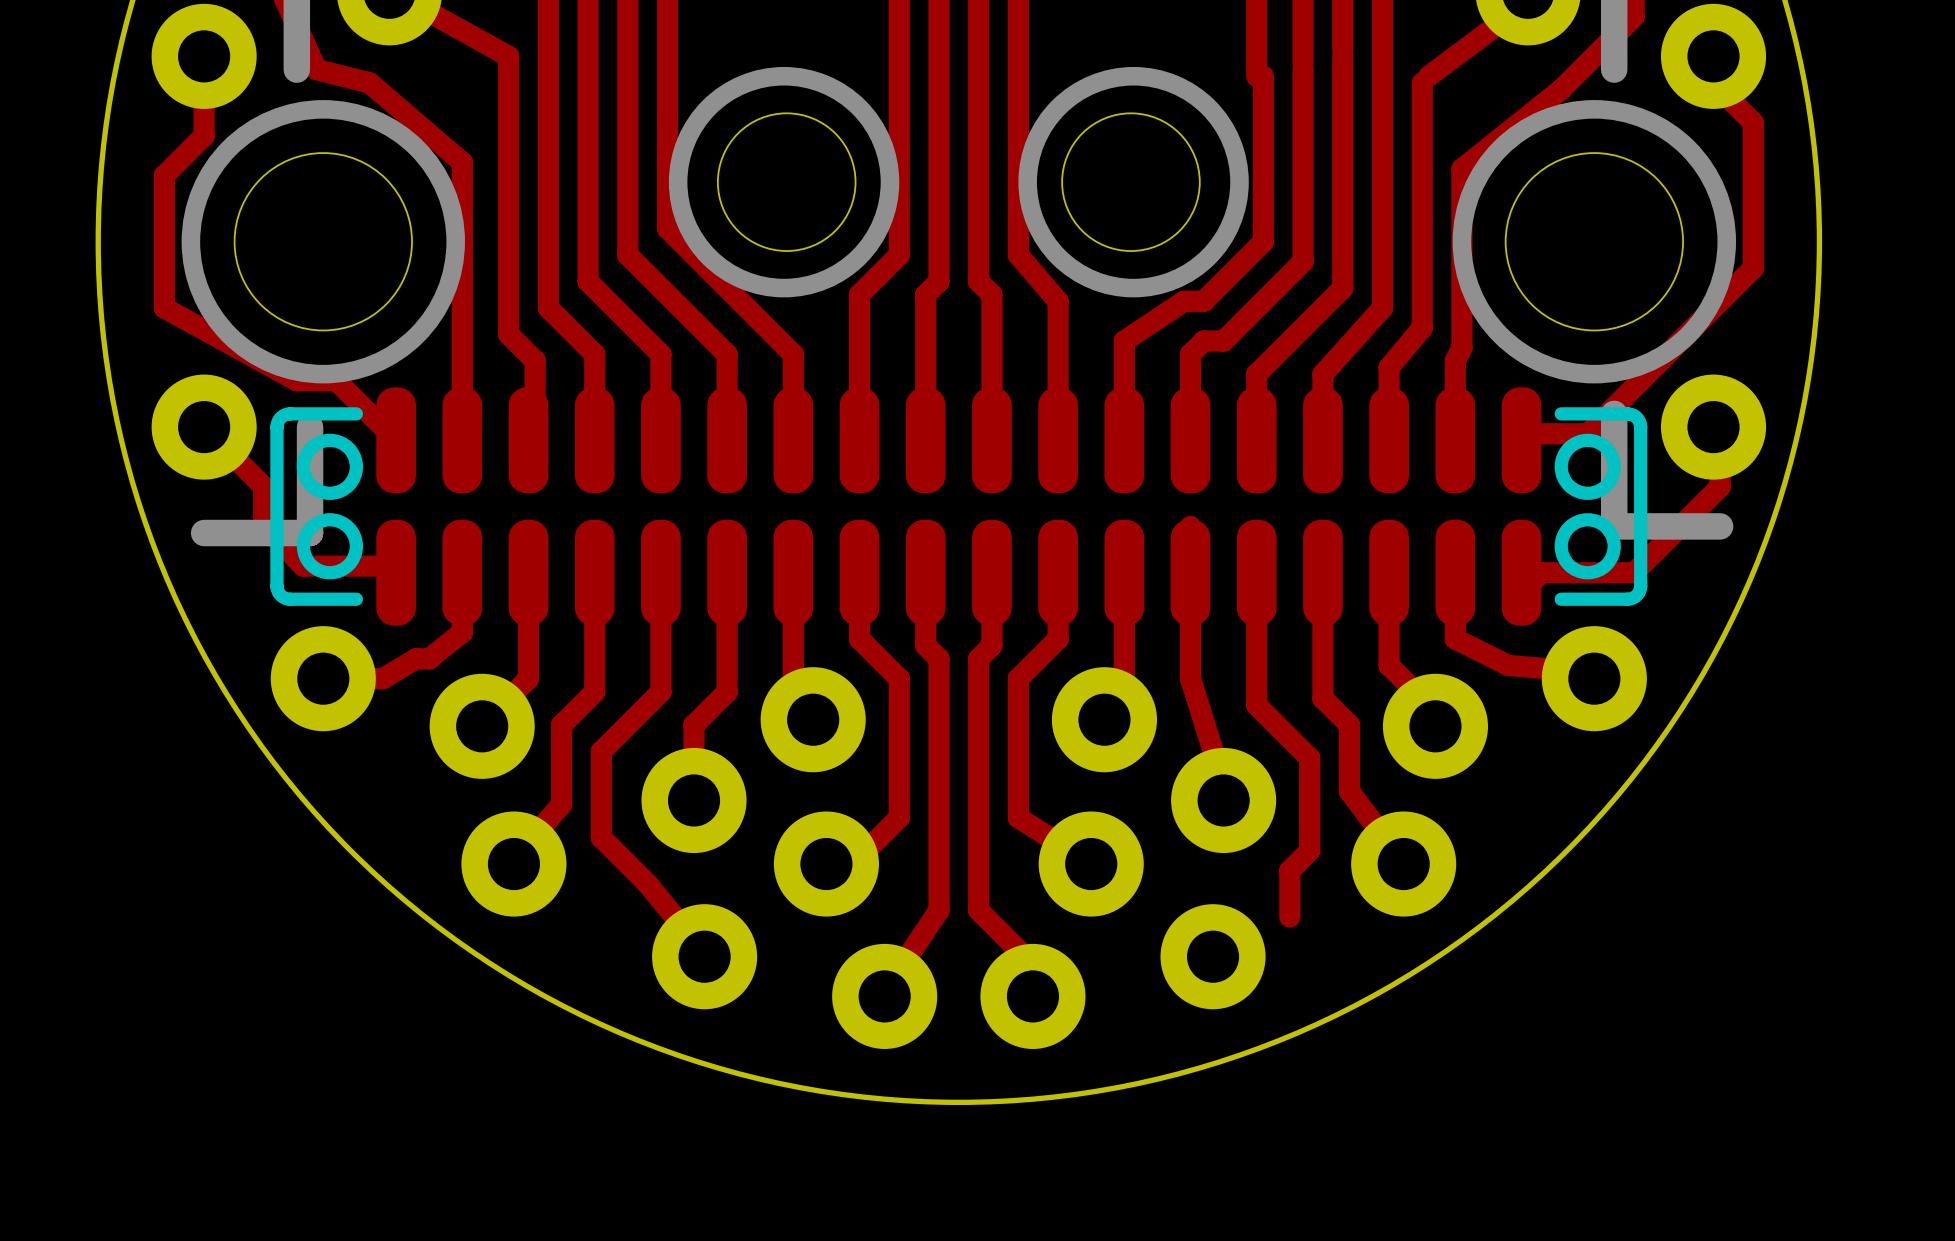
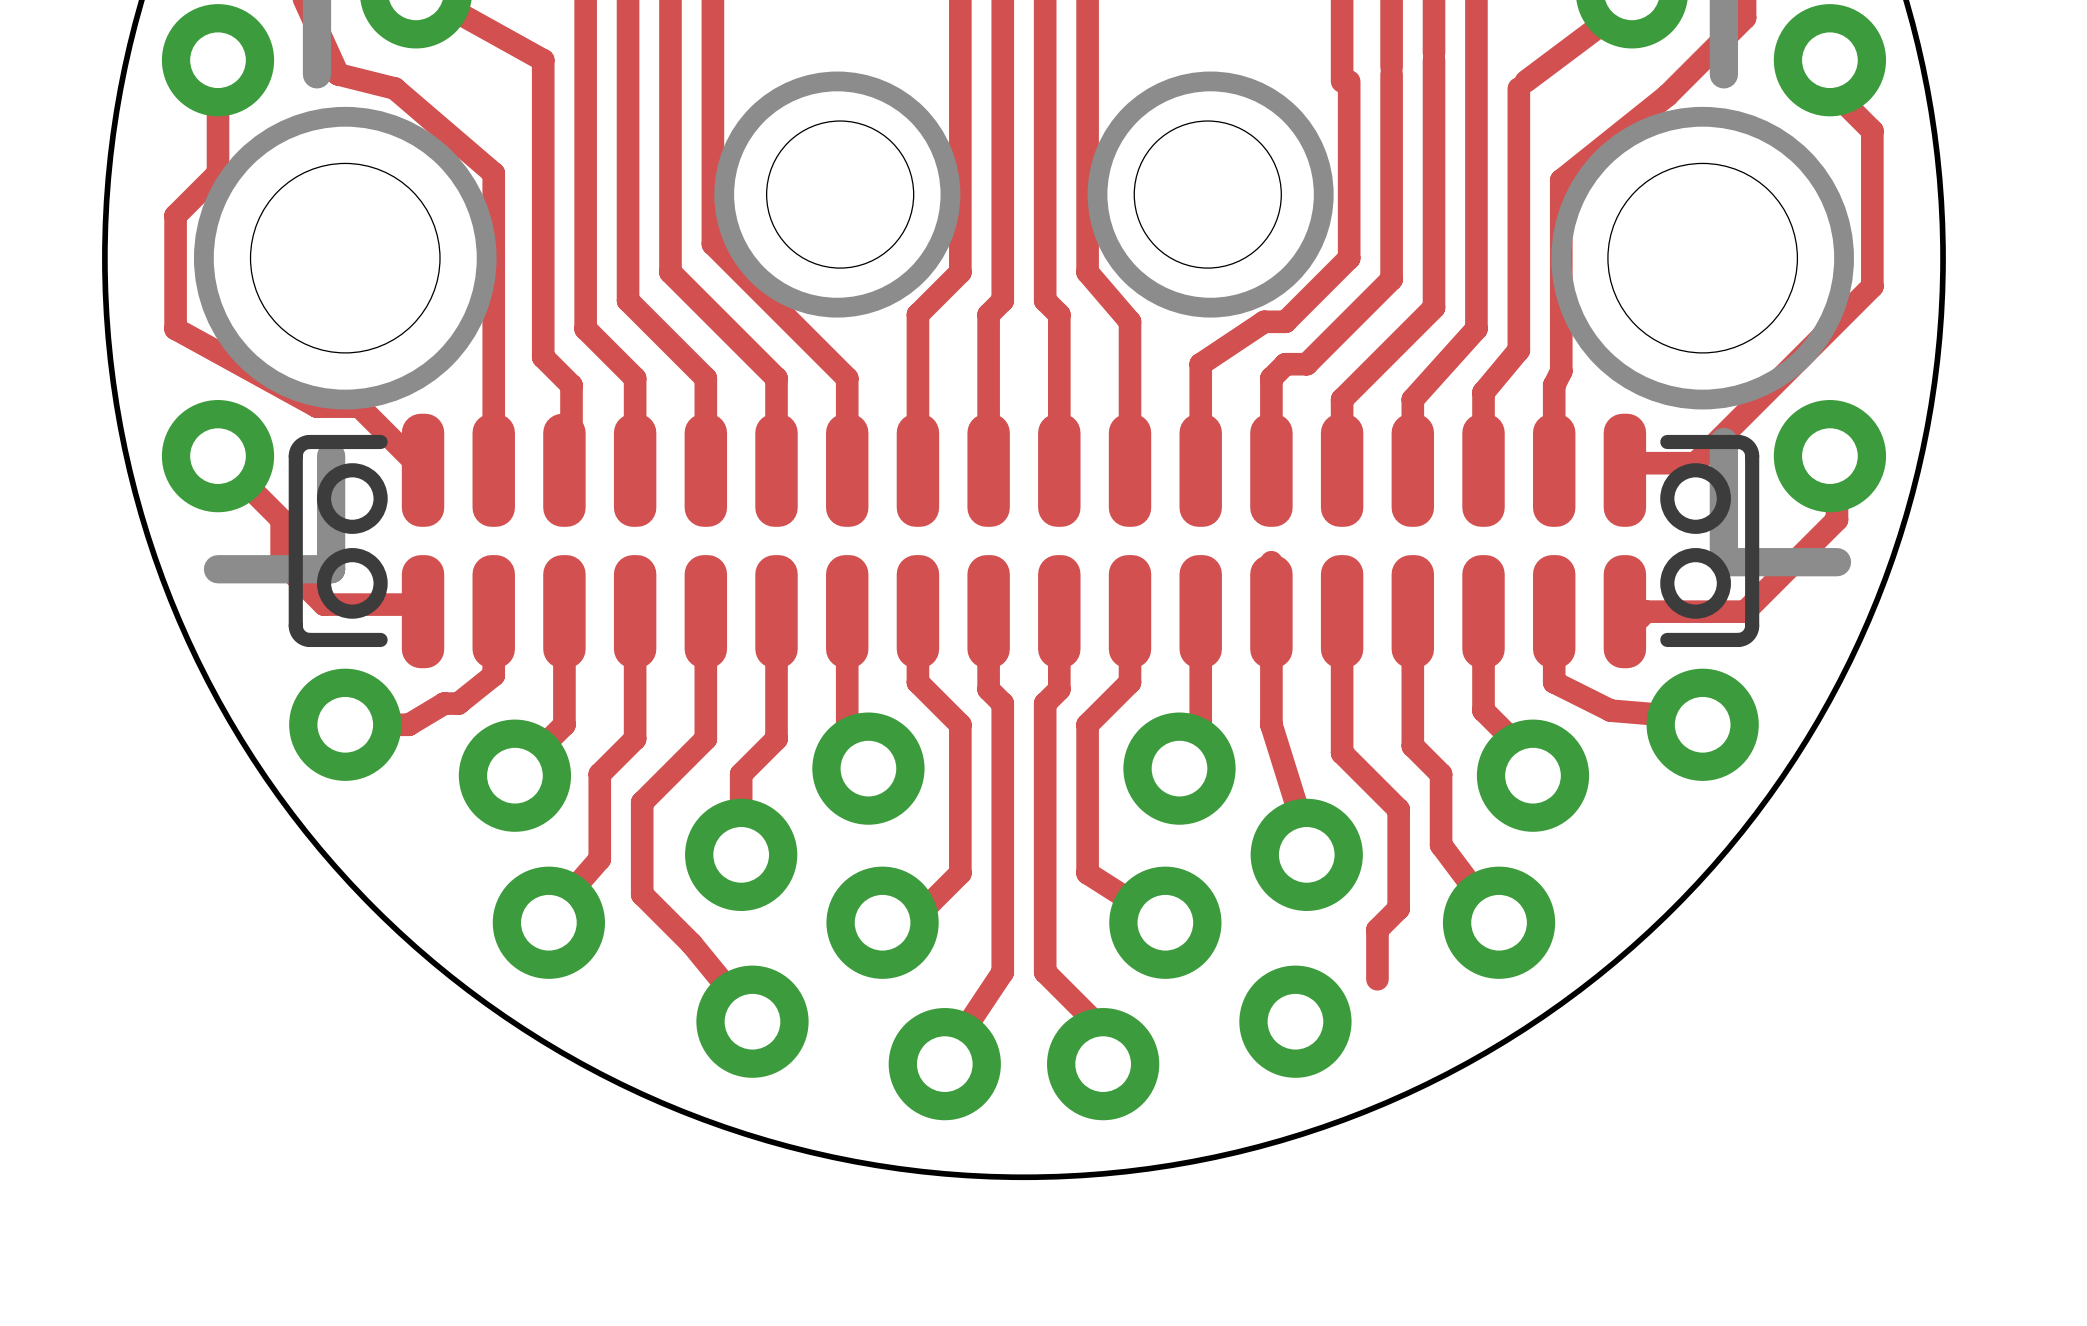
track: (204, 135) (164, 175) (164, 202) -> (218, 145) (218, 173) (175, 215)

